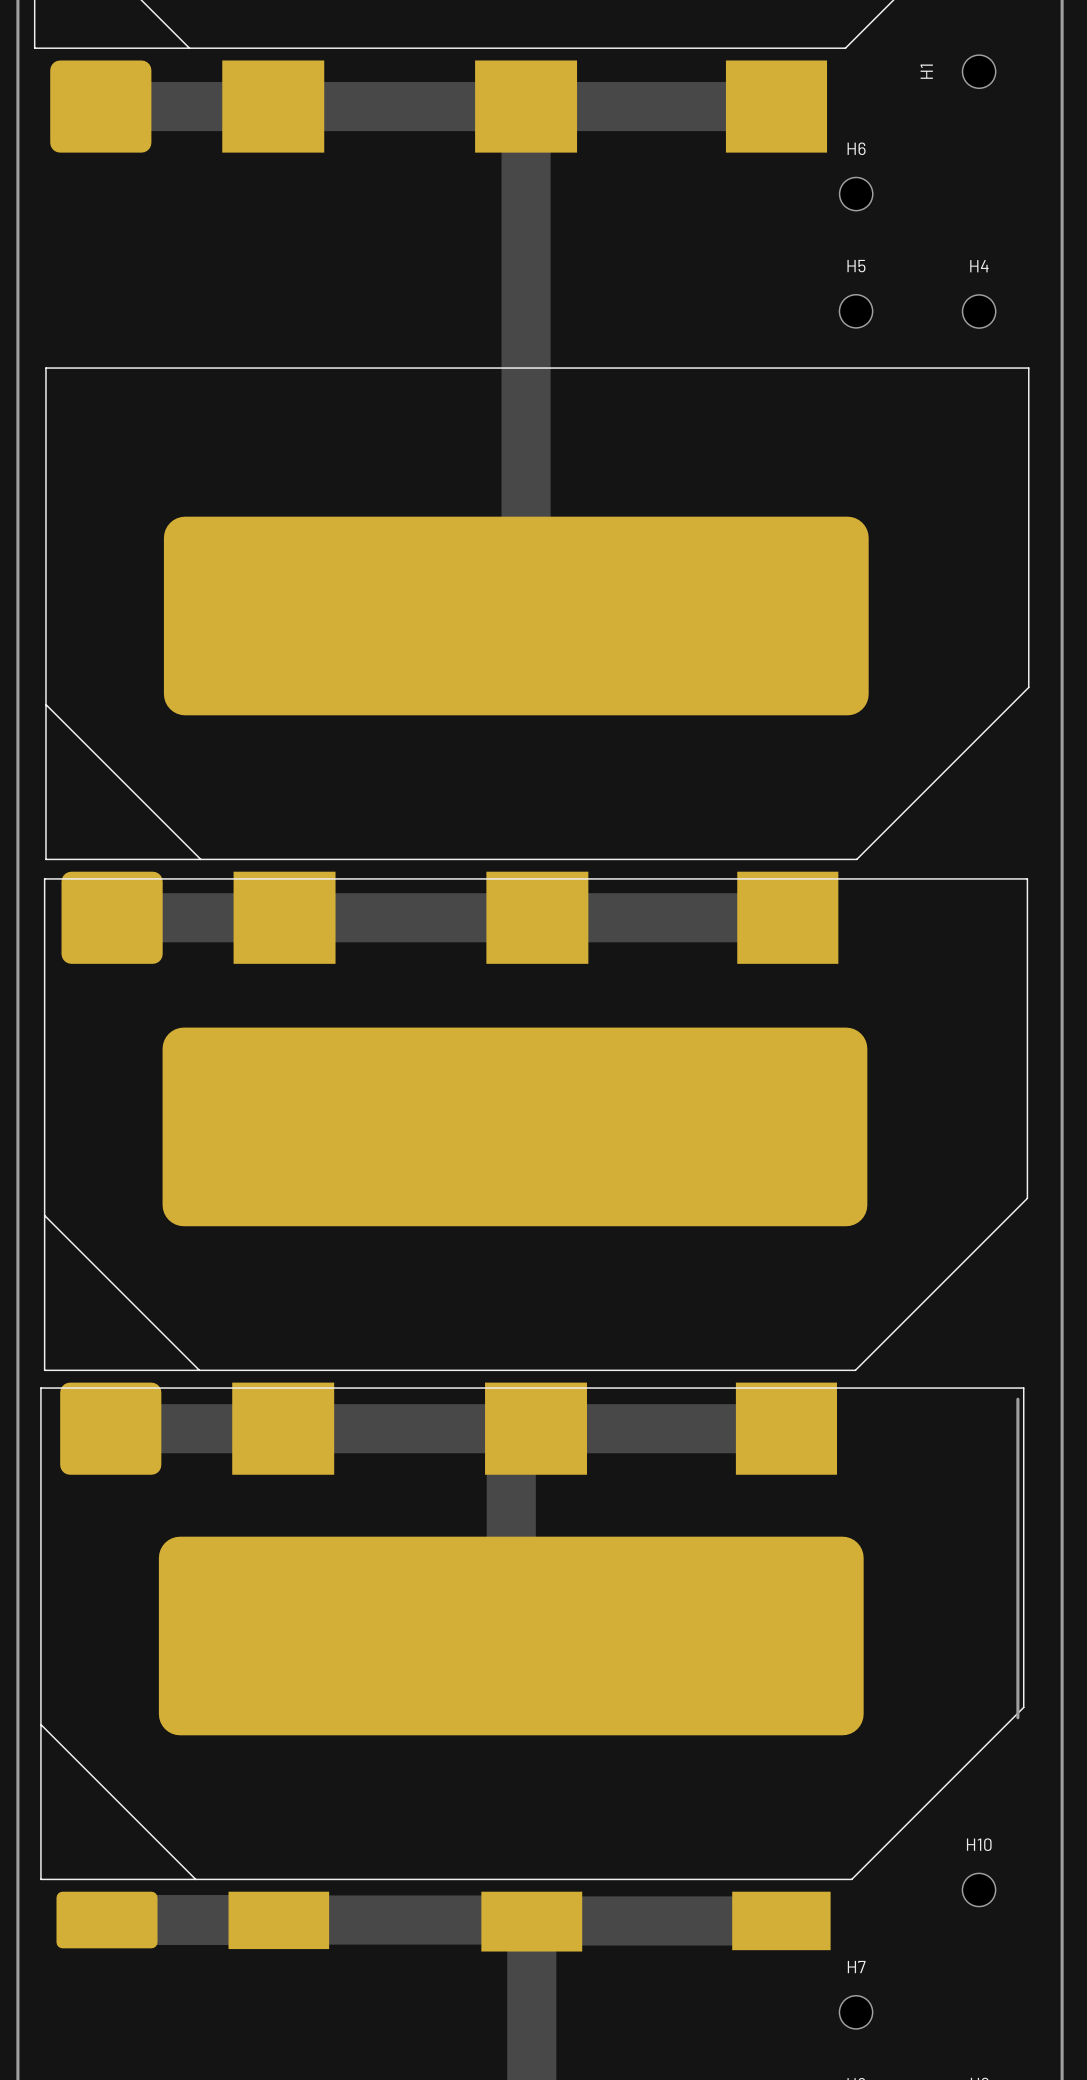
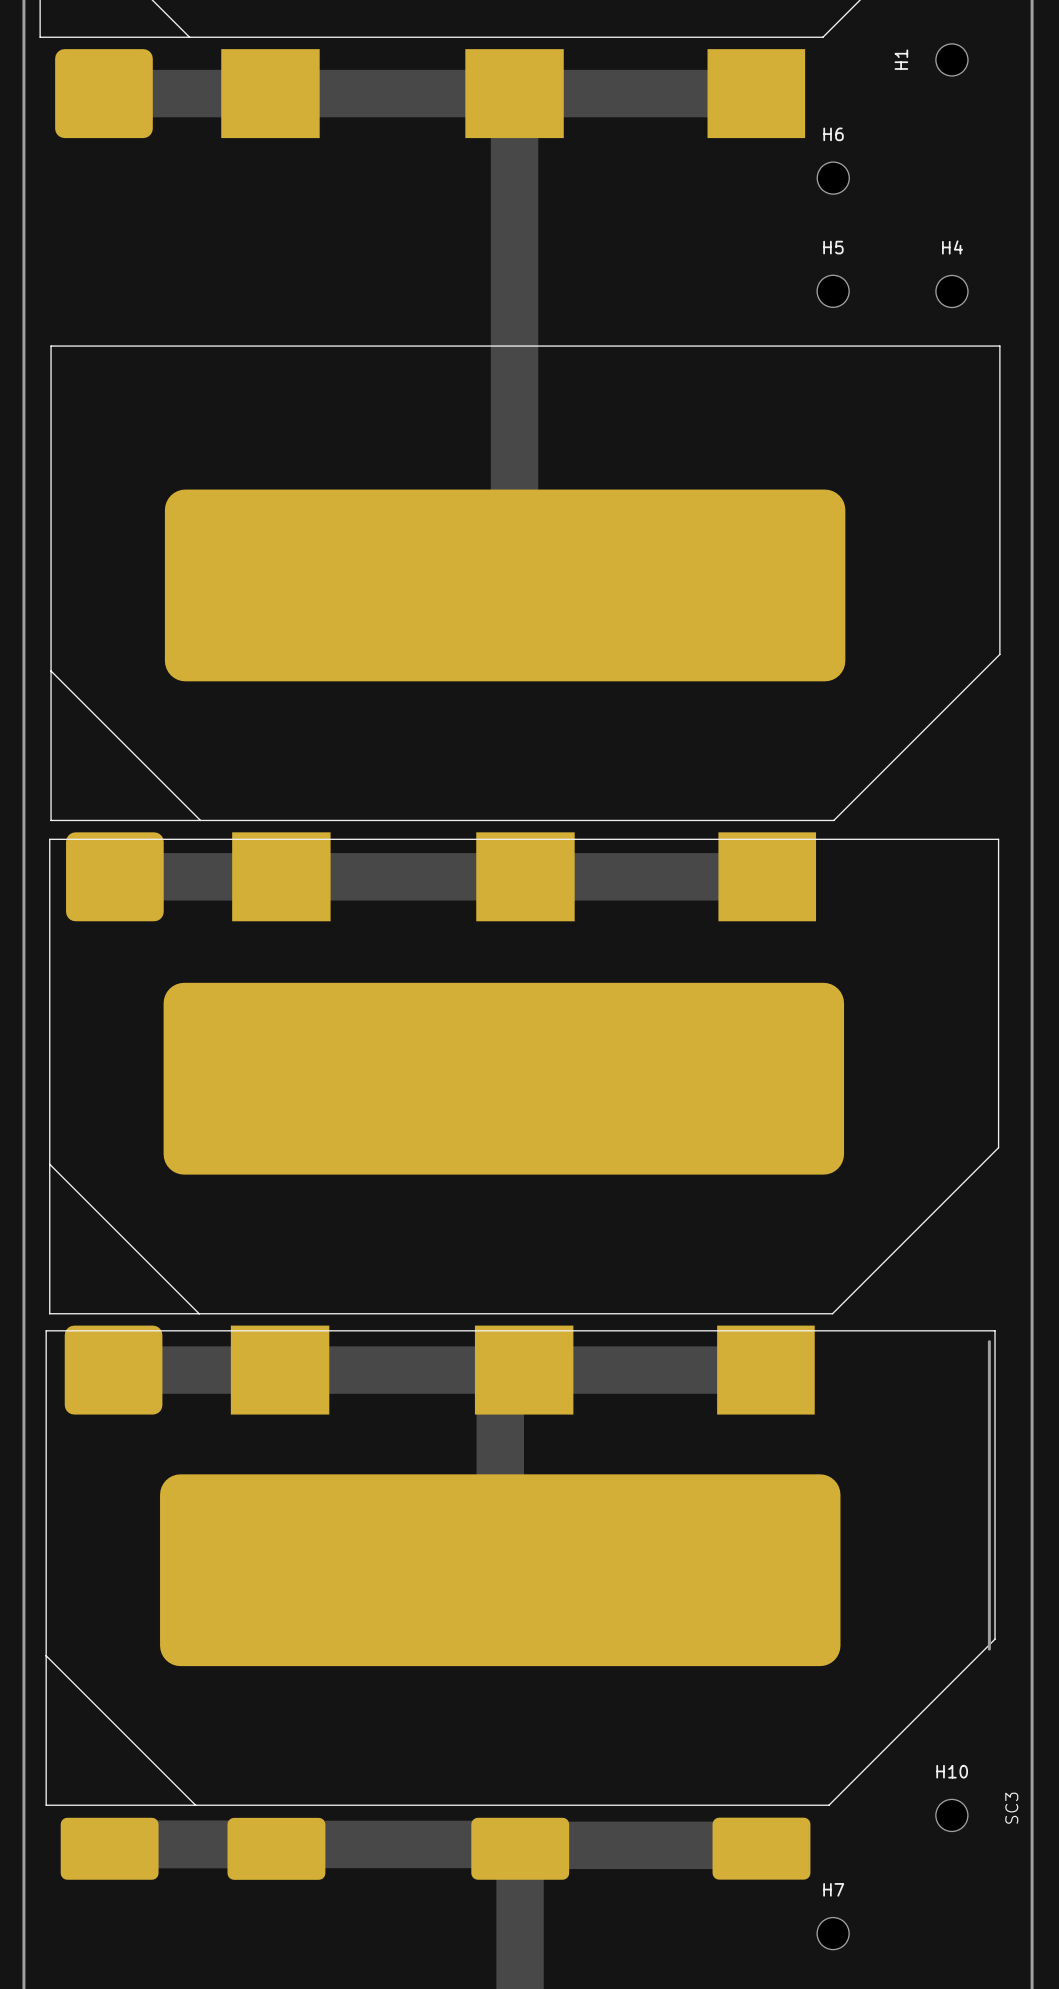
part: (532, 1669) -> none
SC3: none -> (520, 1605)

